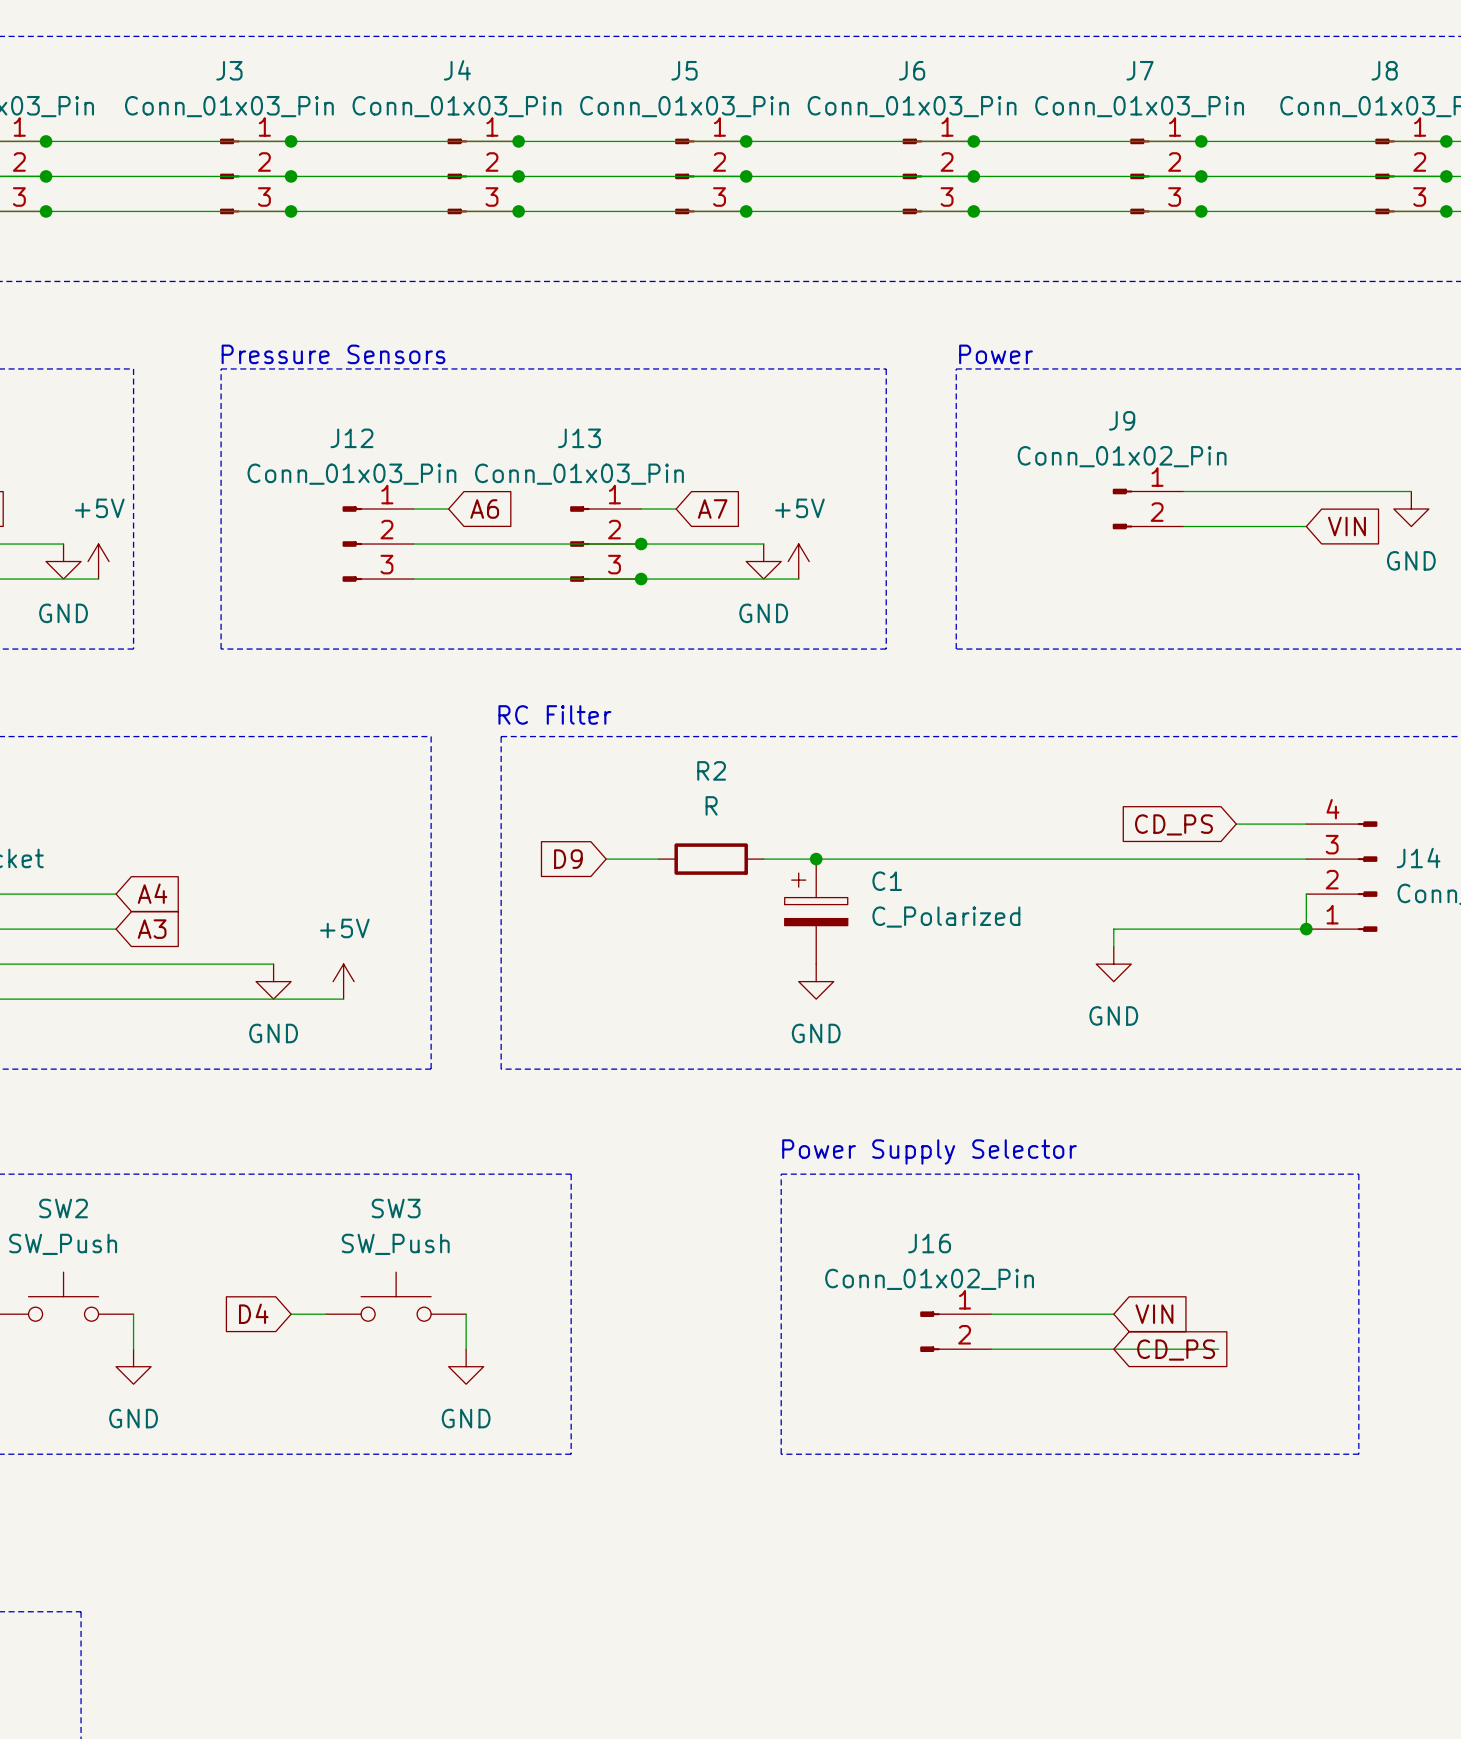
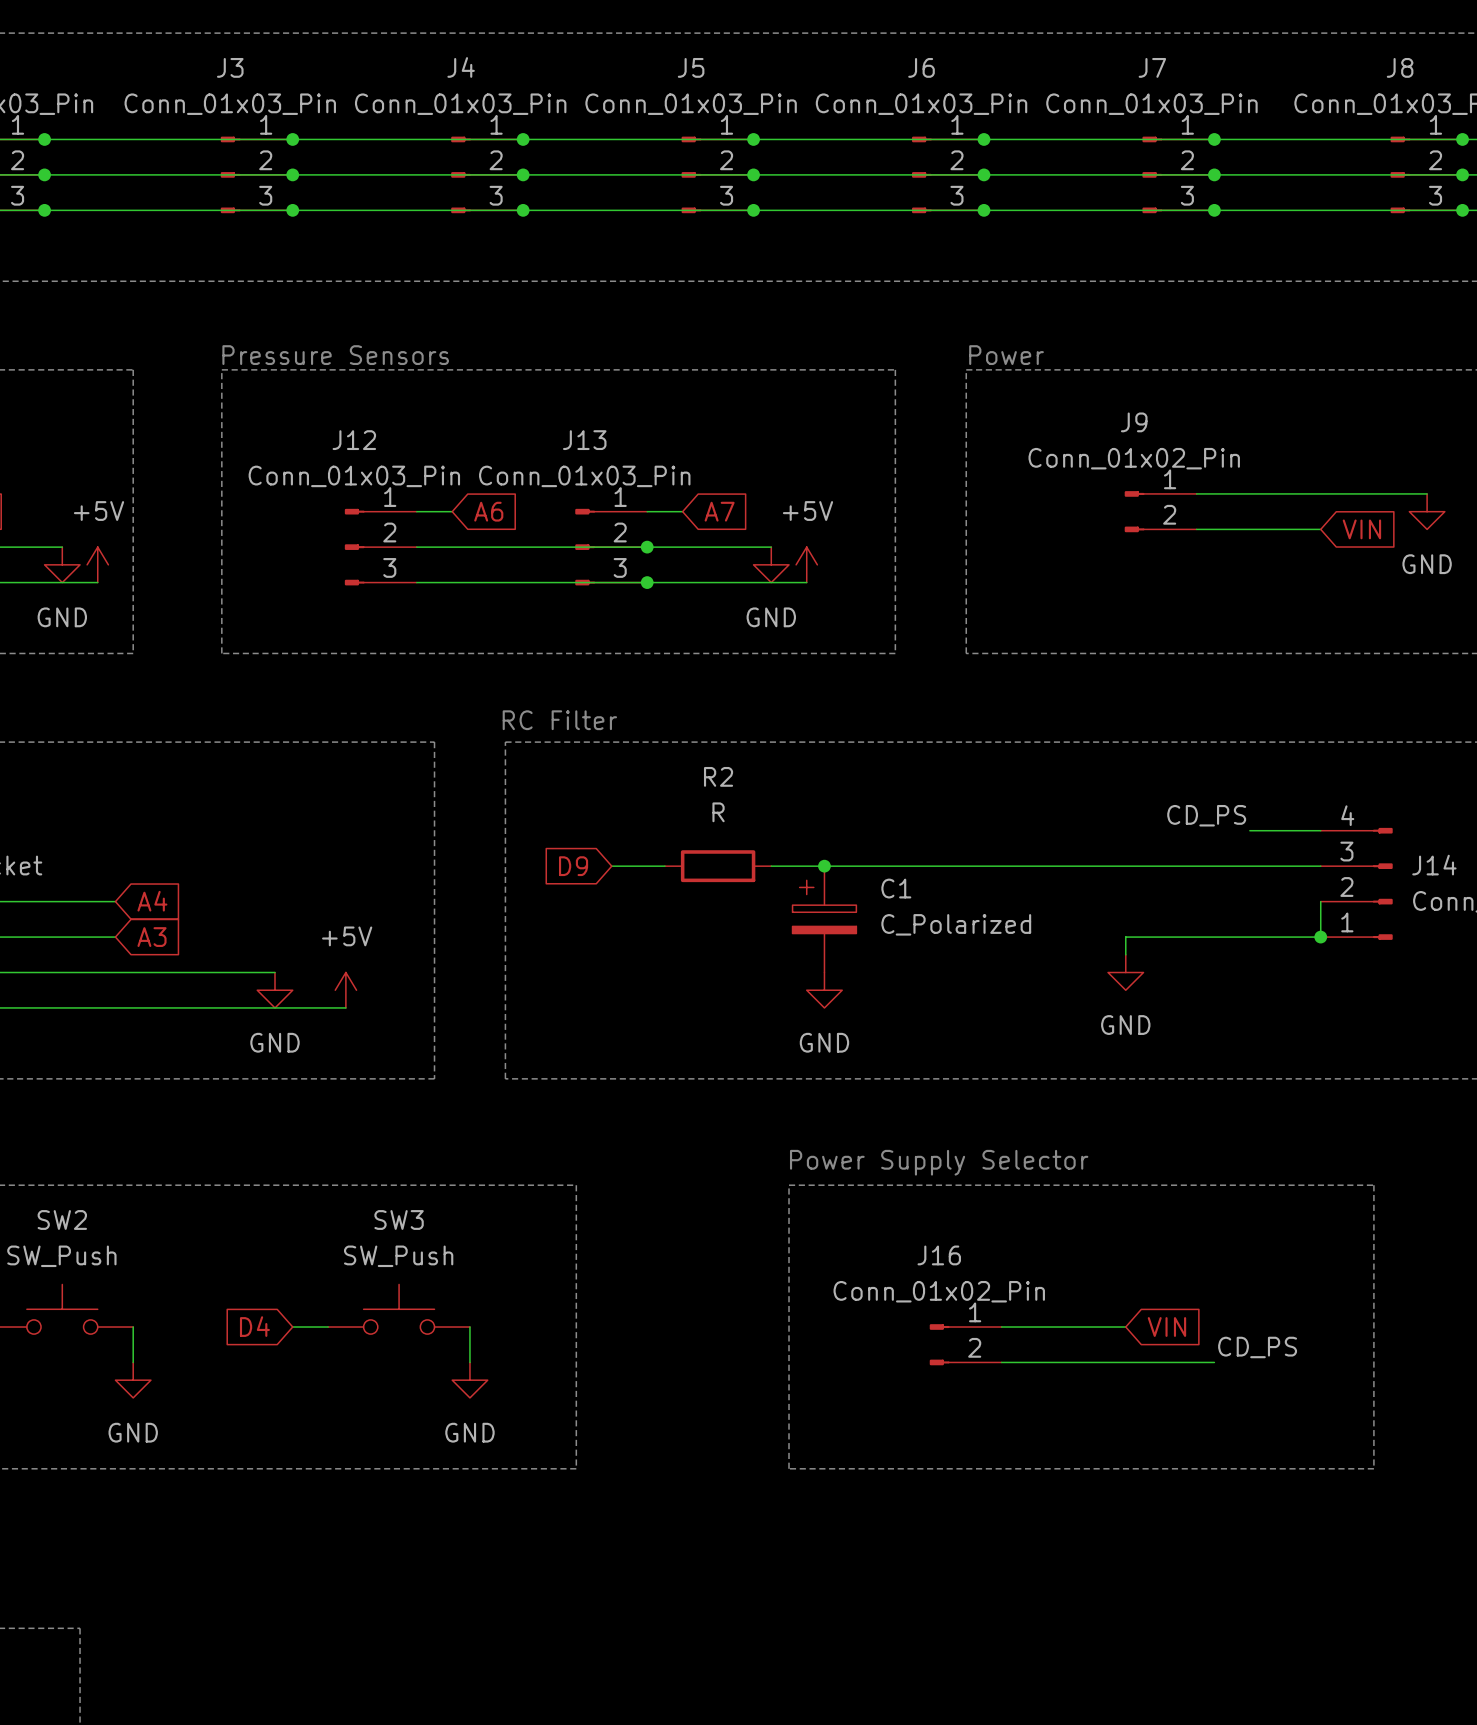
label: none -> CD_PS (1206, 815)
global label: CD_PS (1173, 824) -> none
label: none -> CD_PS (1257, 1347)
wire: (1201, 1349) (1218, 1349) -> none
global label: CD_PS (1176, 1350) -> none

